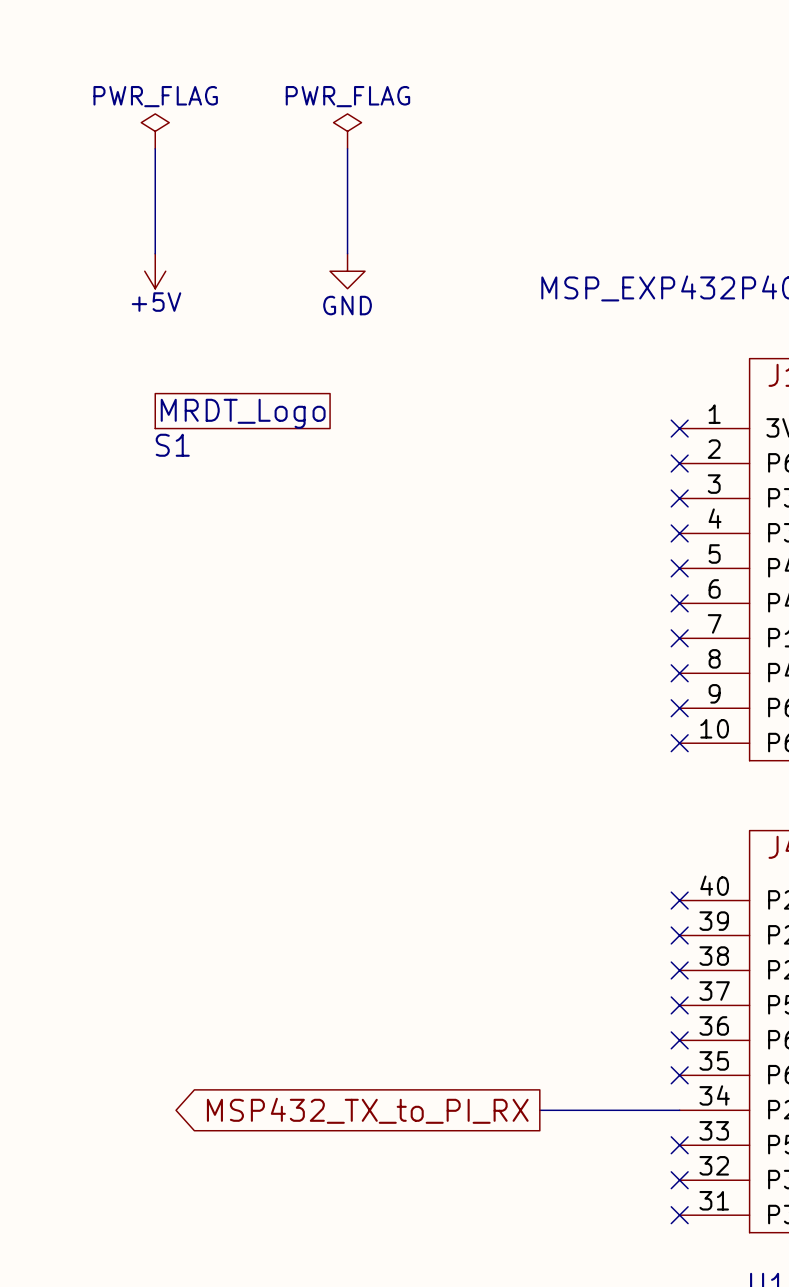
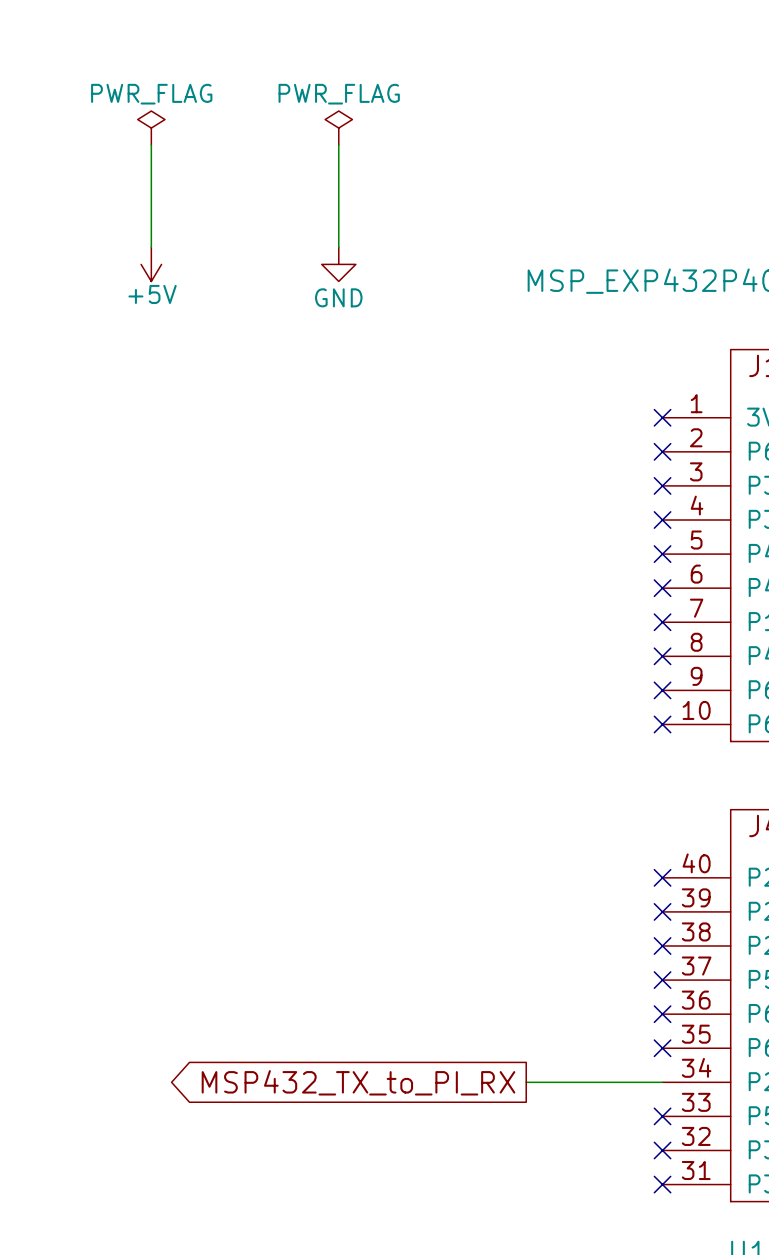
S1: MRDT_Logo (242, 411) -> none

